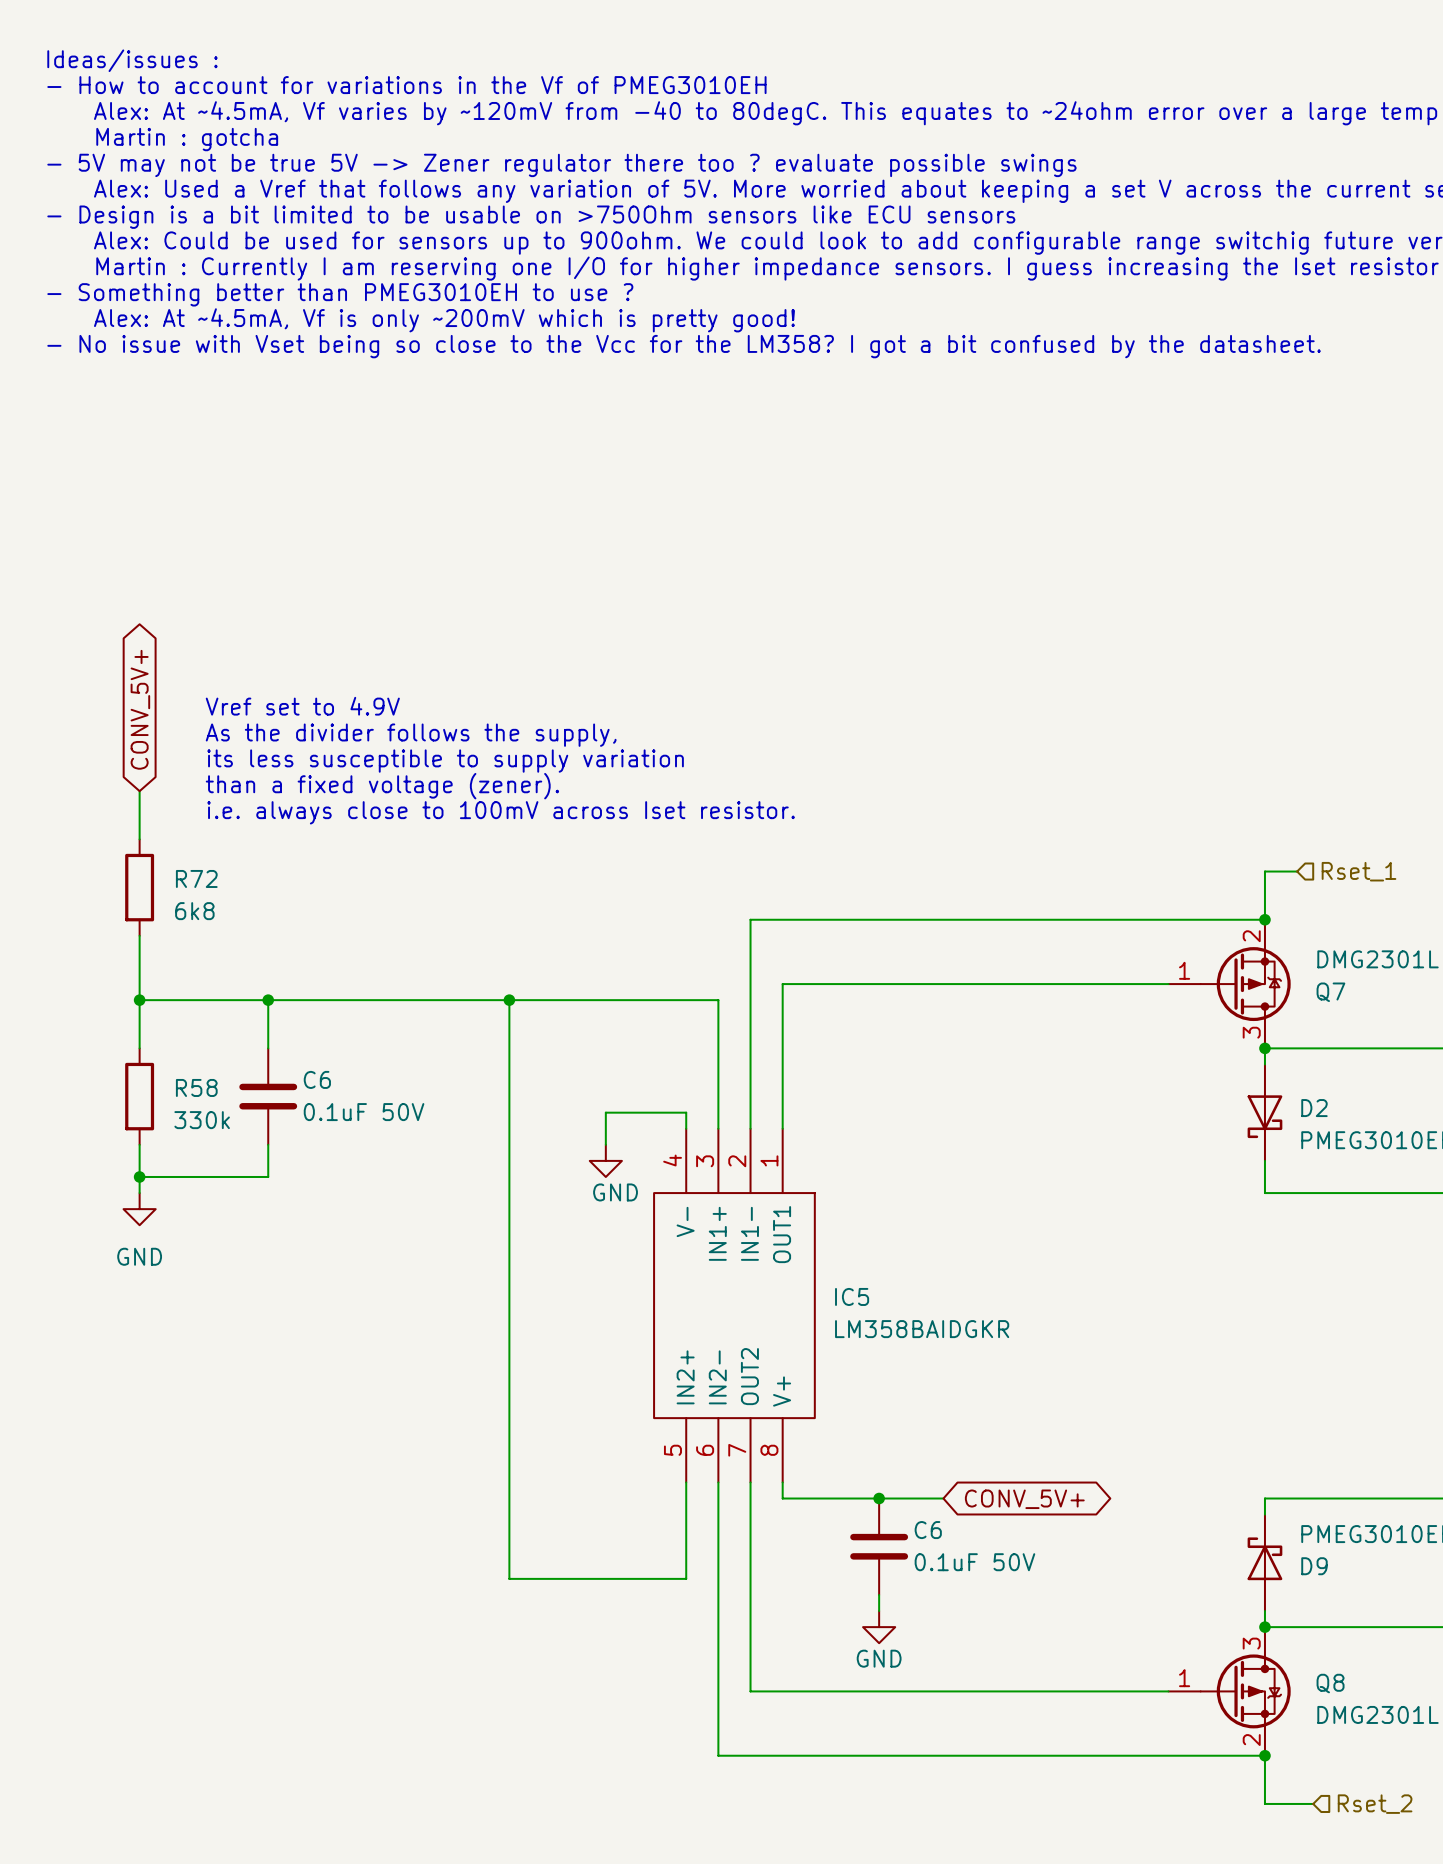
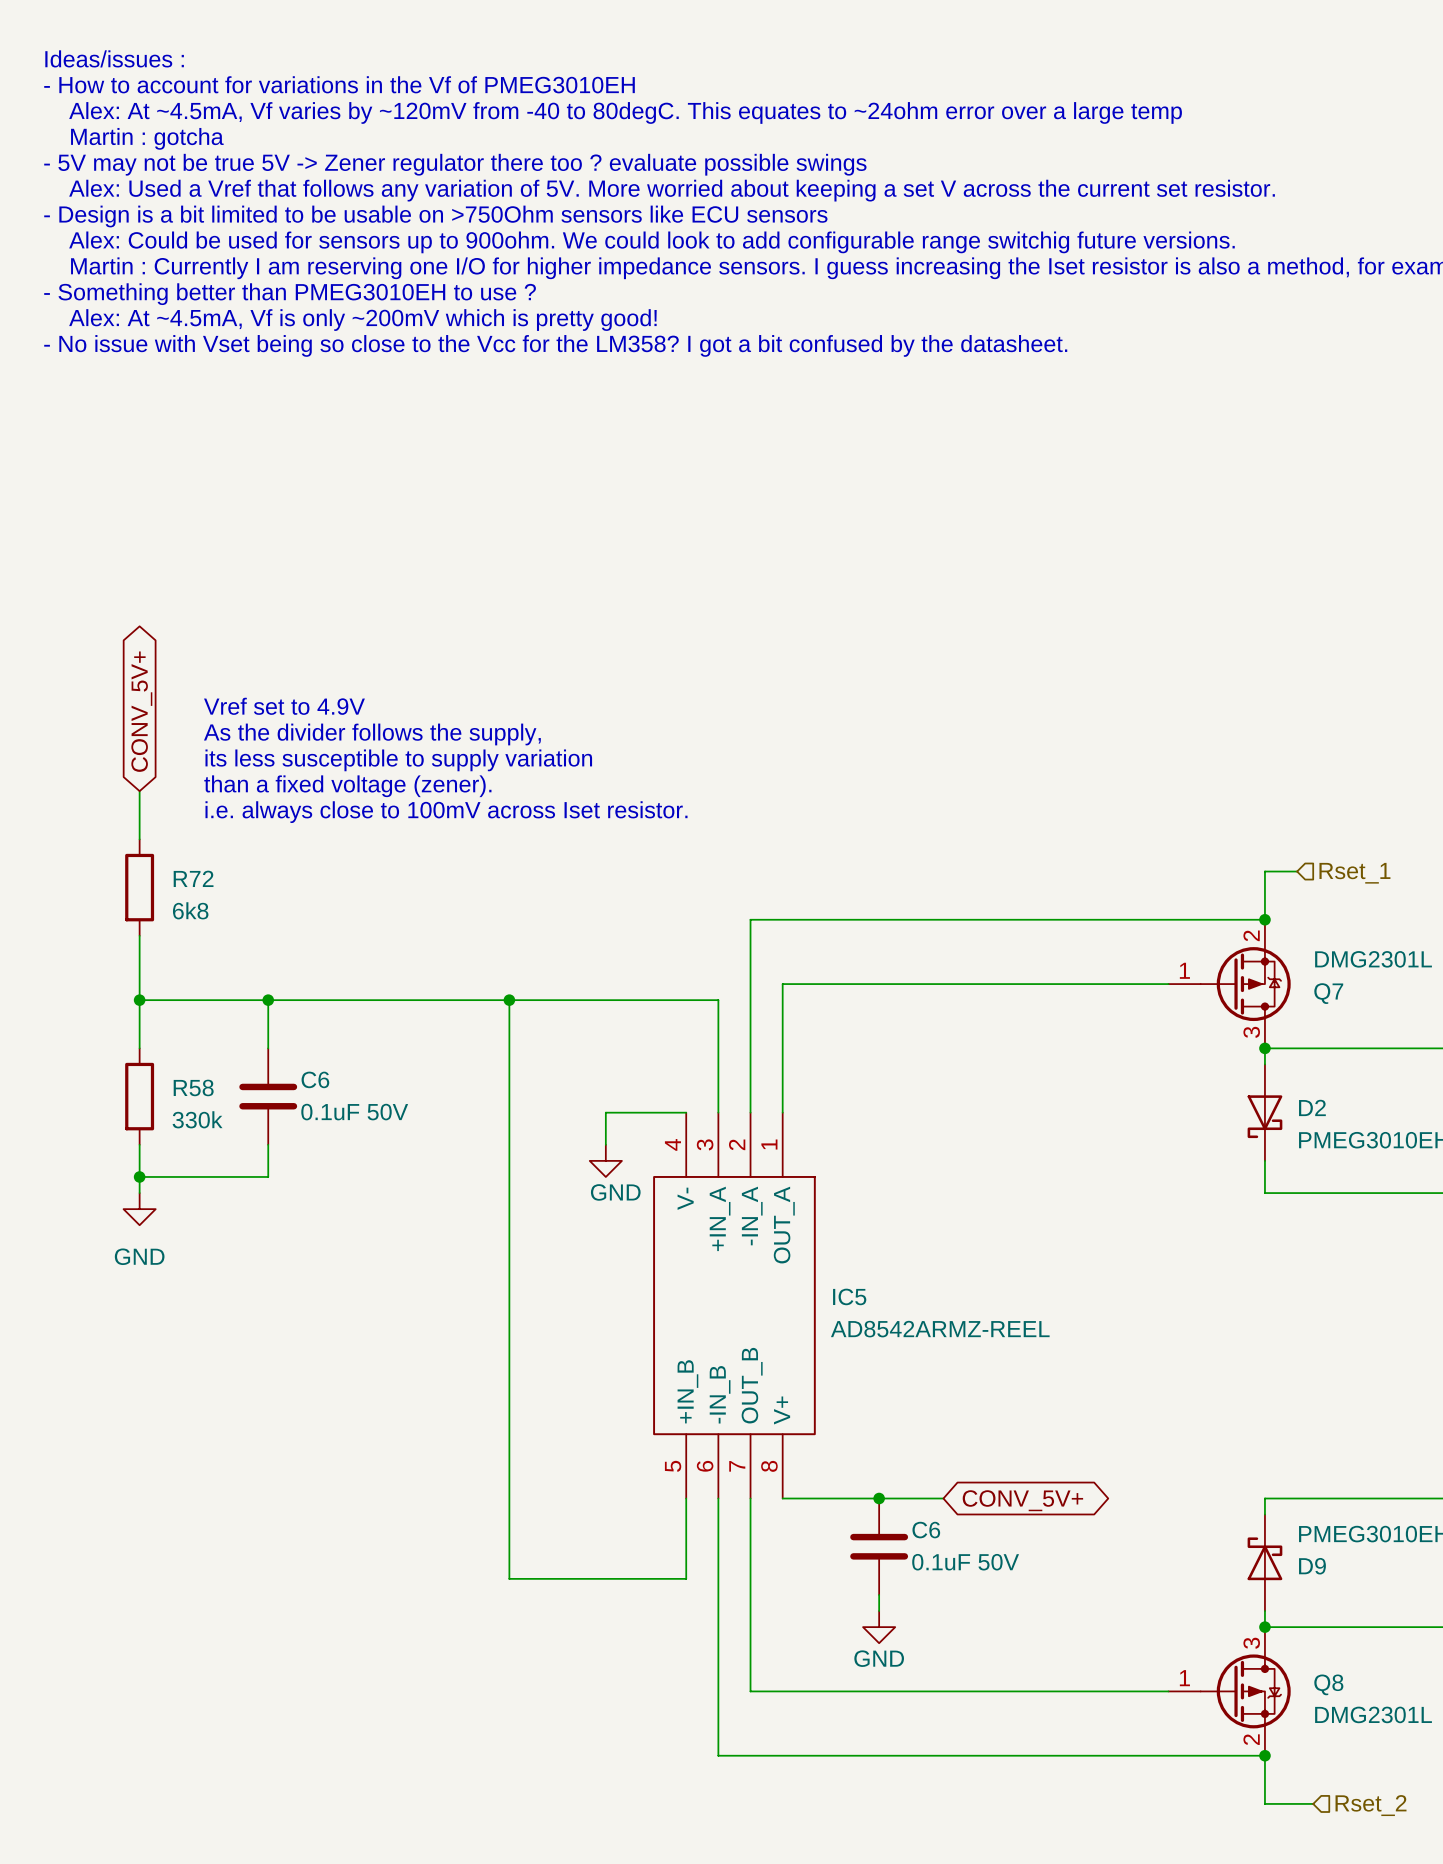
IC5 symbol: [653, 1128, 816, 1483] -> [653, 1112, 816, 1499]
IC5 value: LM358BAIDGKR (922, 1329) -> AD8542ARMZ-REEL (940, 1329)

